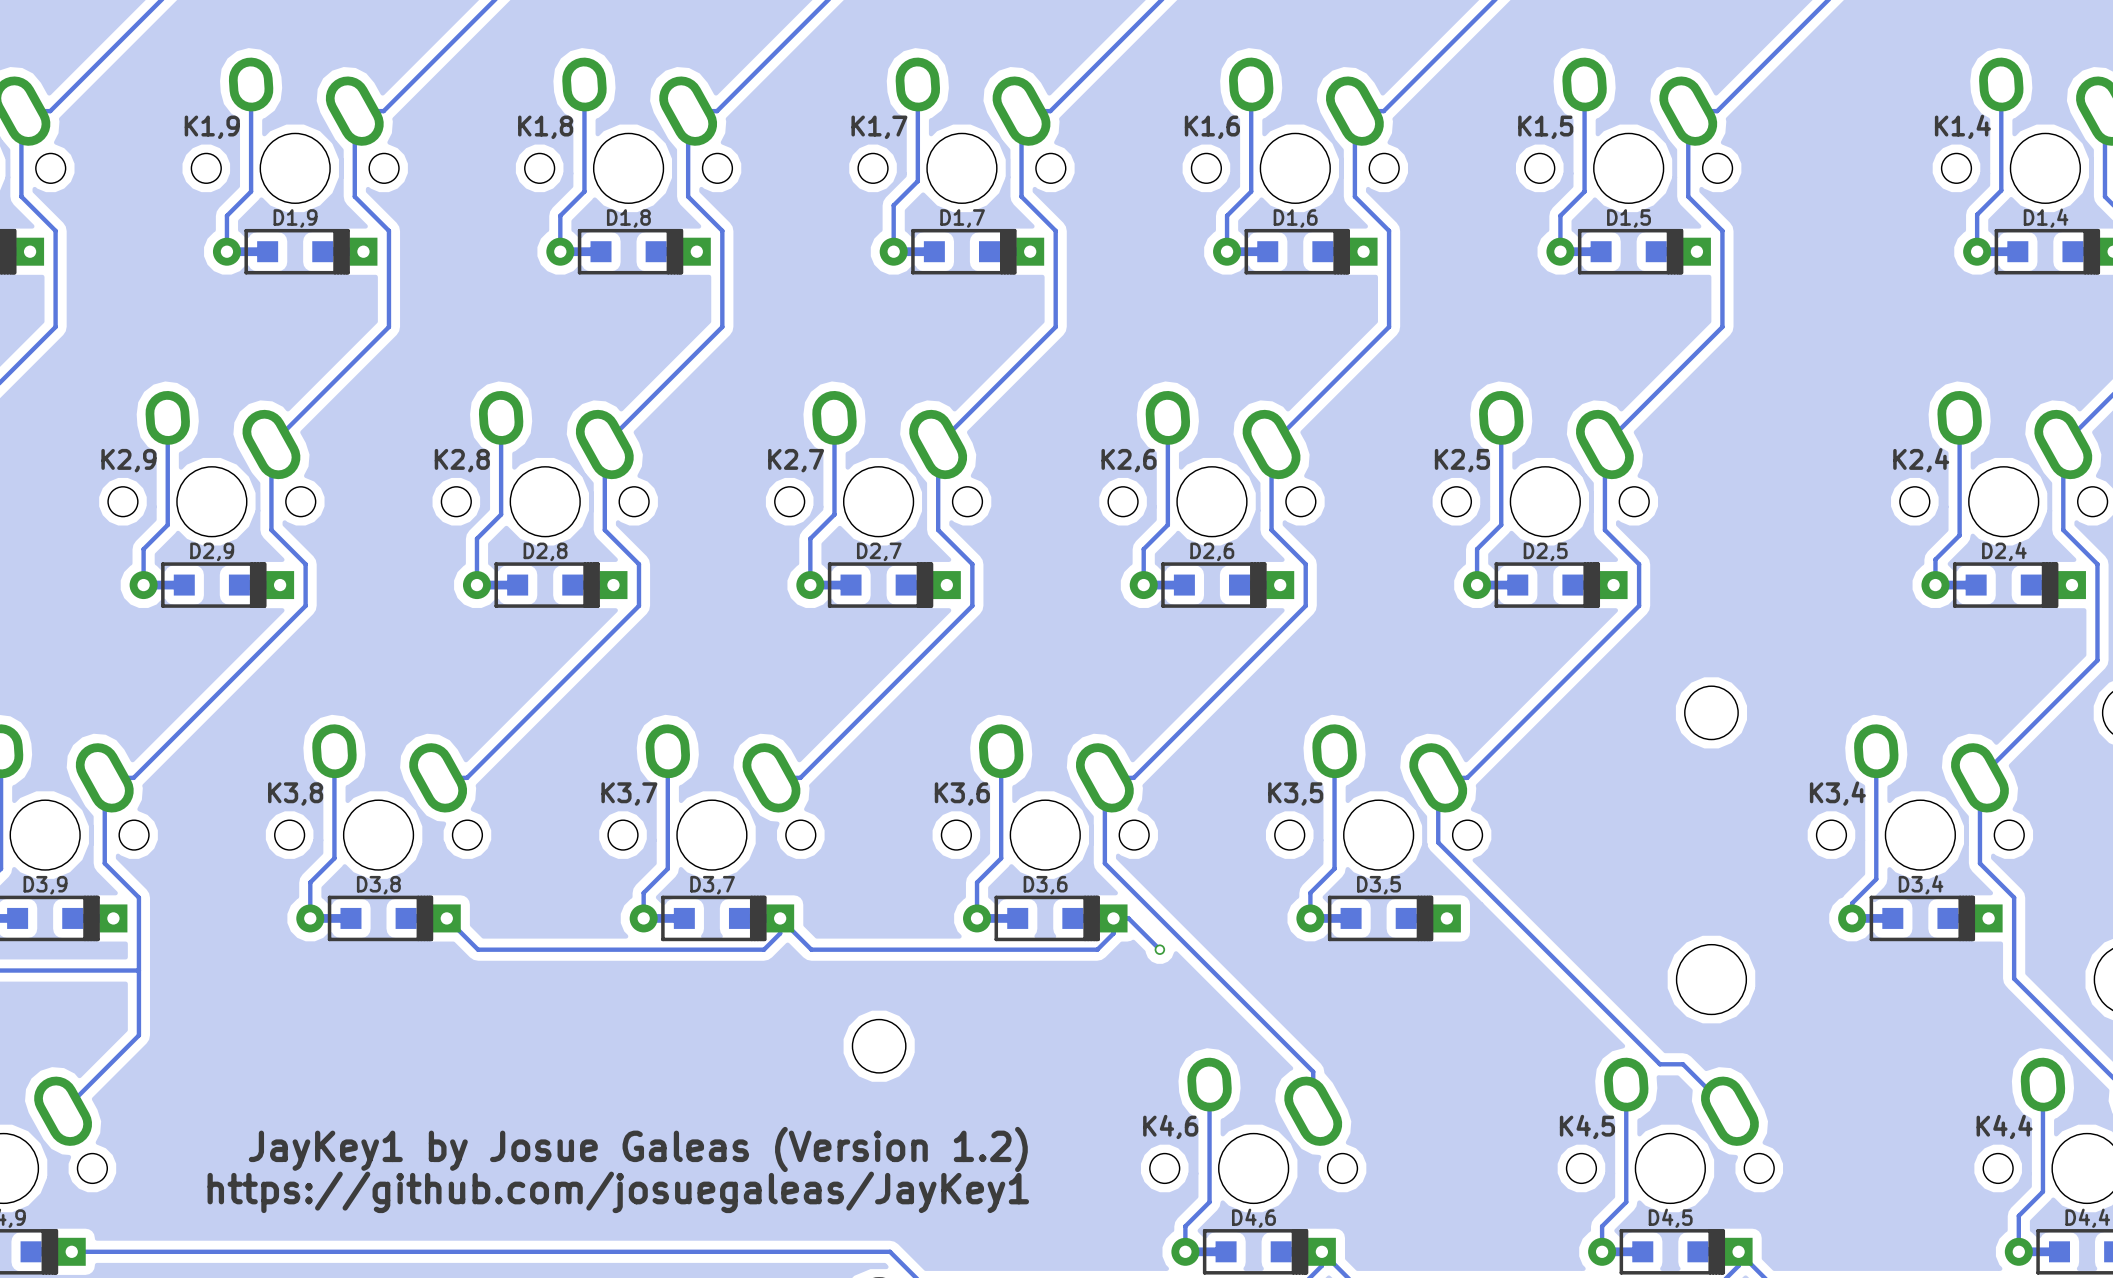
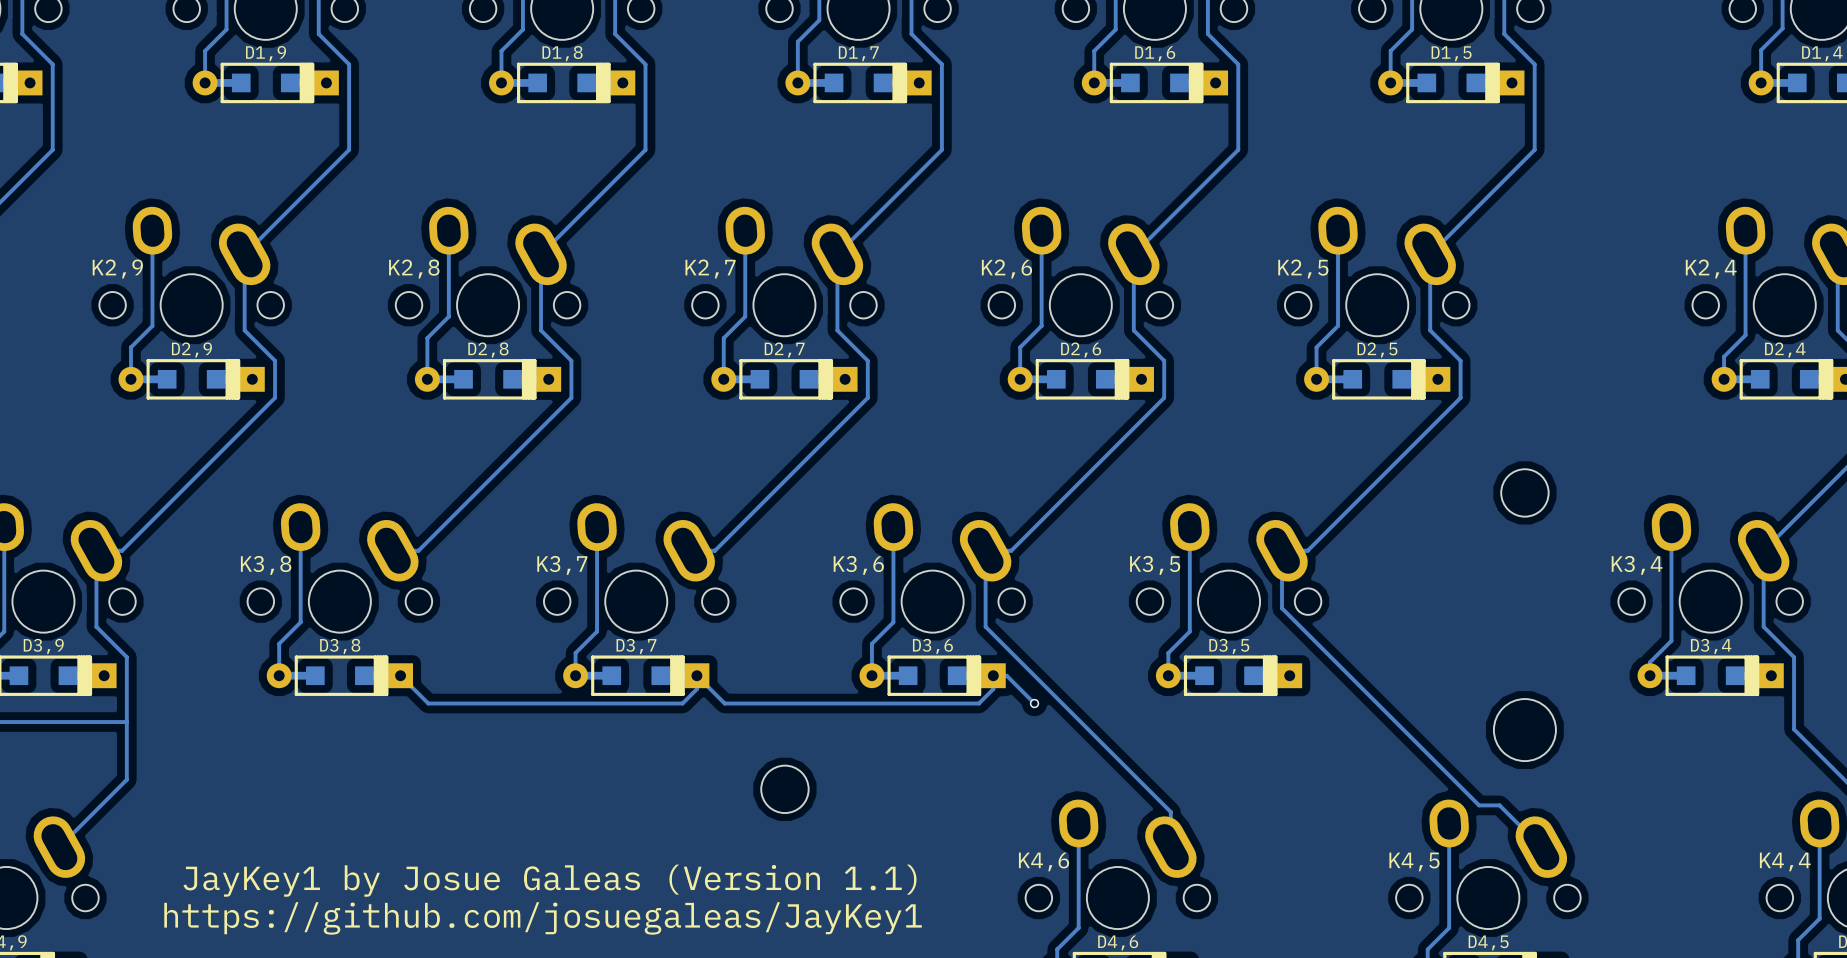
text: JayKey1 by Josue Galeas (Version 1.2) (638, 1149) -> JayKey1 by Josue Galeas (Version 1.1) (550, 880)

